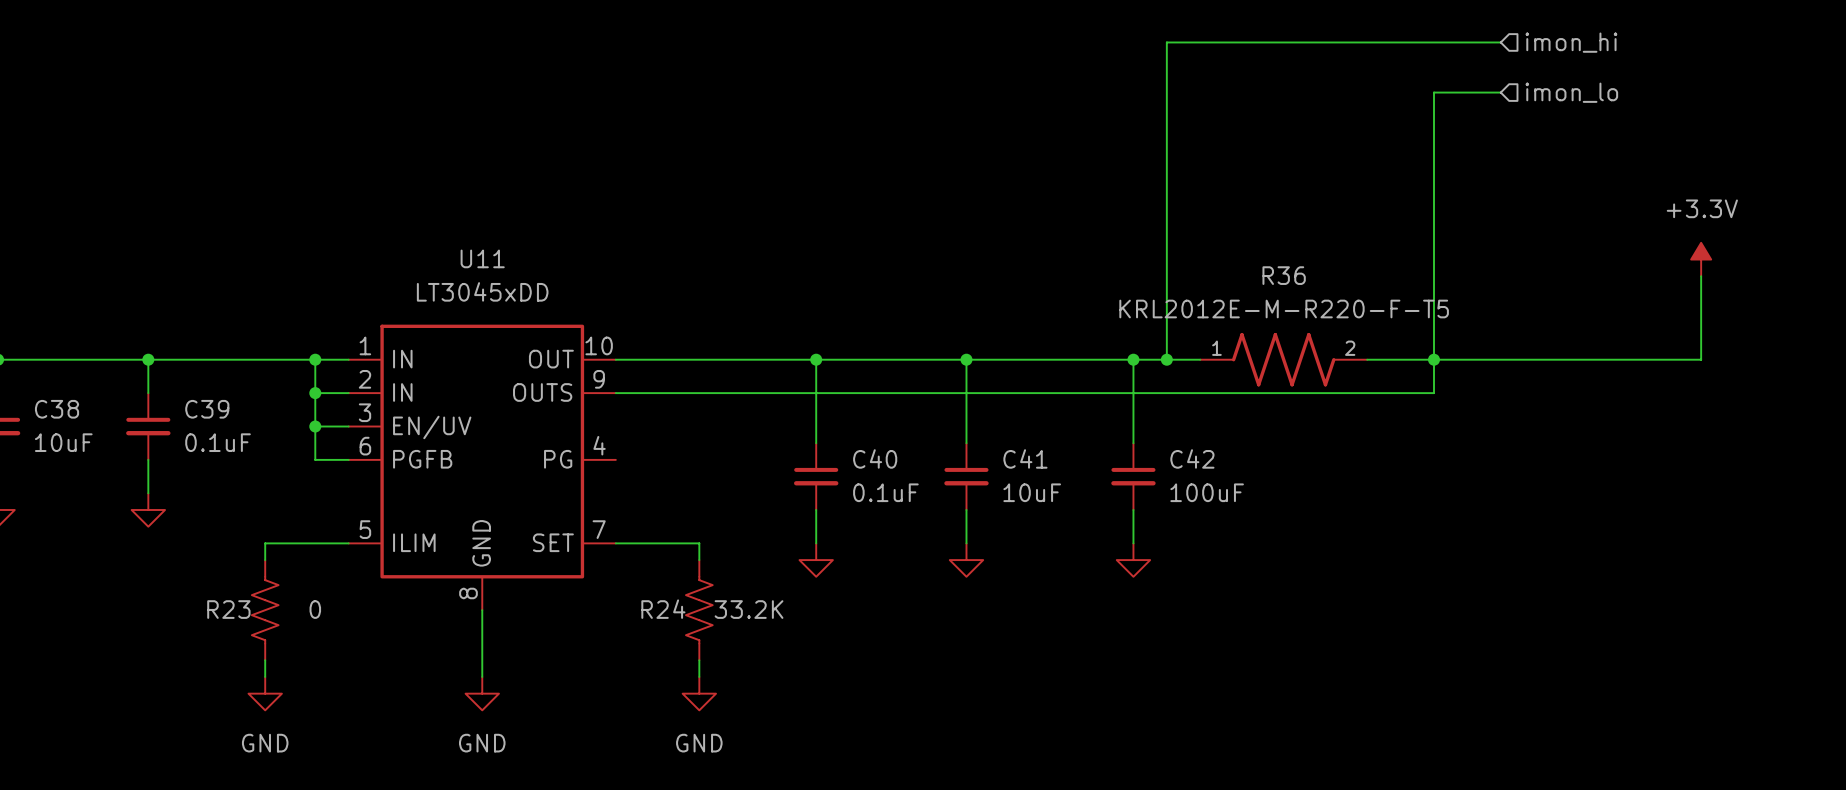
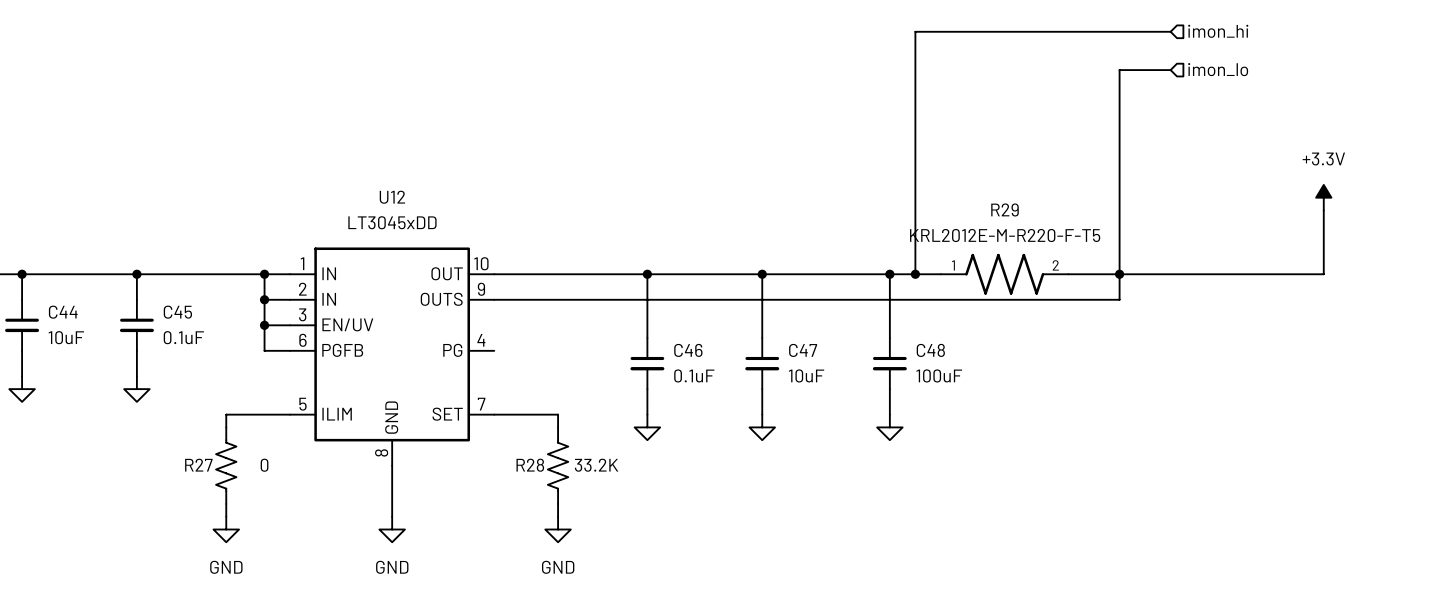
U11 name: U11 (482, 258) -> U12 (392, 197)
R36 name: R36 (1284, 275) -> R29 (1004, 209)
C38 name: C38 (57, 409) -> C44 (63, 312)
C39 name: C39 (207, 409) -> C45 (177, 312)
C40 name: C40 (875, 458) -> C46 (688, 350)
C41 name: C41 (1025, 458) -> C47 (803, 350)
C42 name: C42 (1192, 458) -> C48 (930, 350)
R23 name: R23 (228, 609) -> R27 (198, 465)
R24 name: R24 (663, 609) -> R28 (530, 465)

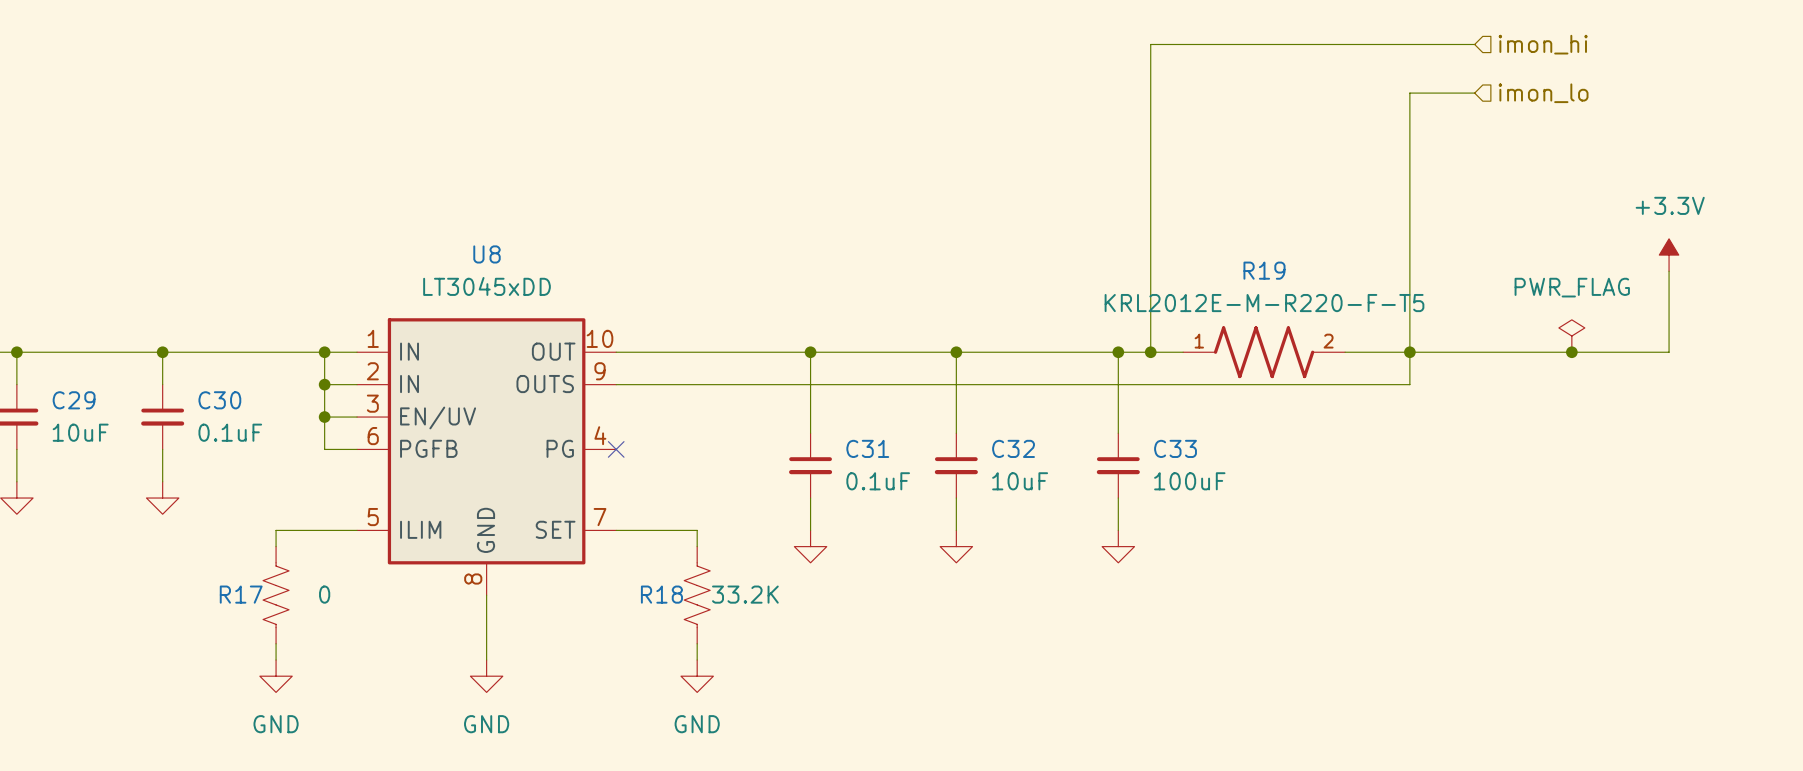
U12 name: U12 (392, 197) -> U8 (487, 254)
R29 name: R29 (1004, 209) -> R19 (1264, 270)
power symbol: none -> PWR_FLAG (1571, 336)
junction: none -> (1571, 352)
C44 name: C44 (63, 312) -> C29 (74, 400)
C45 name: C45 (177, 312) -> C30 (219, 400)
no-connect mark: none -> (616, 449)
C46 name: C46 (688, 350) -> C31 (867, 448)
C47 name: C47 (803, 350) -> C32 (1013, 448)
C48 name: C48 (930, 350) -> C33 (1175, 448)
R27 name: R27 (198, 465) -> R17 (241, 594)
R28 name: R28 (530, 465) -> R18 (661, 594)

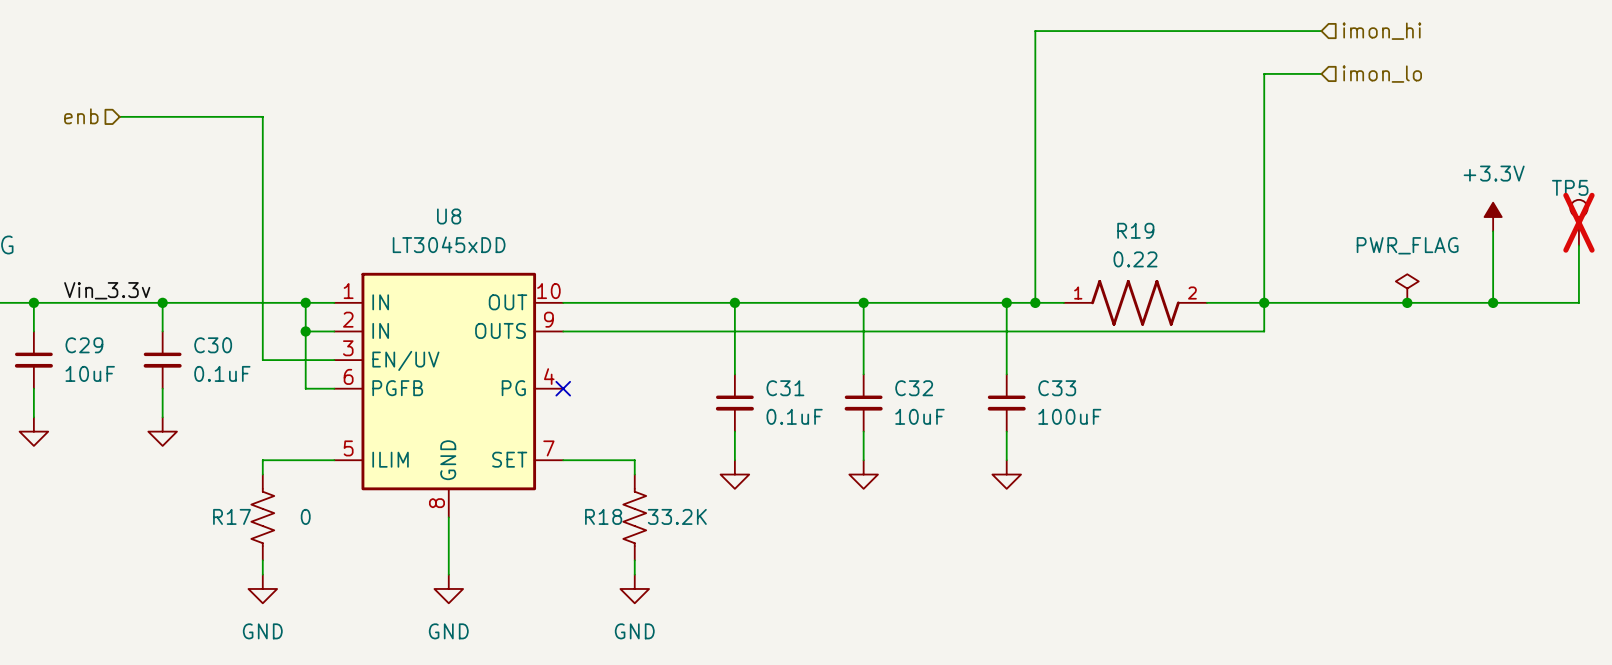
hierarchical label: none -> enb (81, 116)
wire: none -> (119, 116) (262, 116) (262, 360) (305, 360)
TP5: none -> (1578, 222)
wire: none -> (1578, 245) (1578, 302) (1493, 302)
R19 value: KRL2012E-M-R220-F-T5 (1264, 303) -> 0.22 (1135, 259)
label: none -> Vin_3.3v (107, 290)
junction: none -> (1493, 302)
junction: (324, 417) -> none

